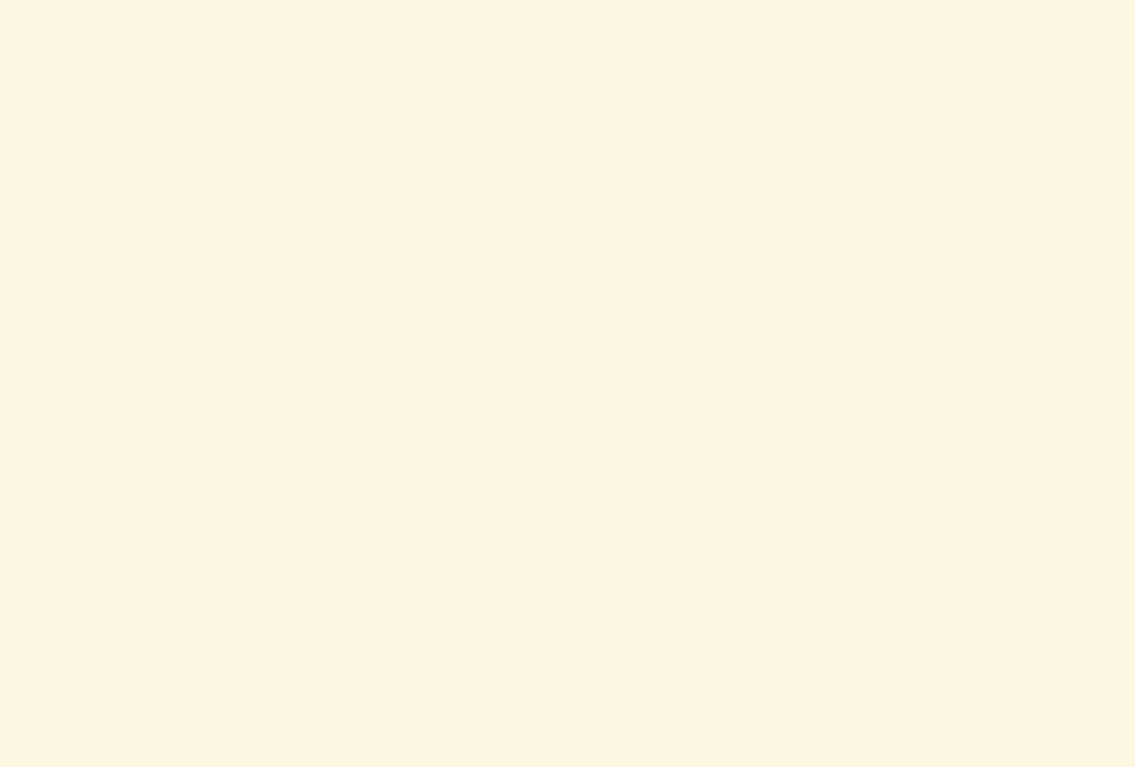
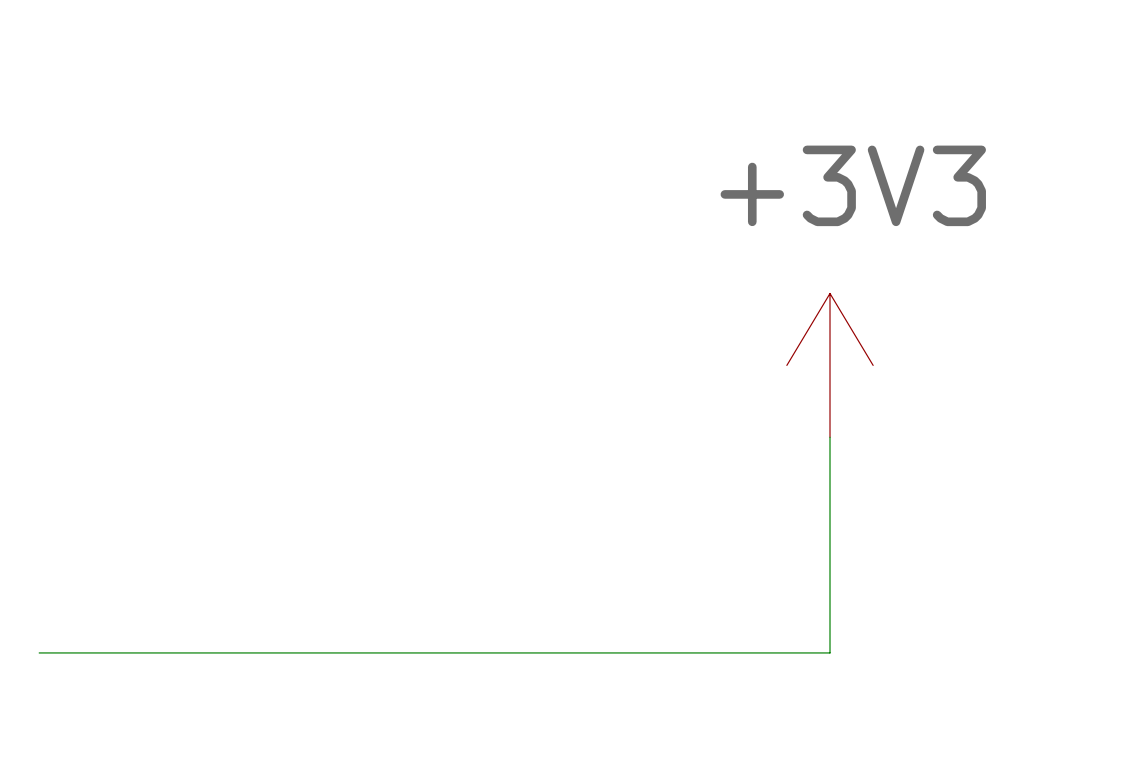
power symbol: none -> +3V3 (830, 365)
wire: none -> (830, 437) (830, 652) (39, 652)

